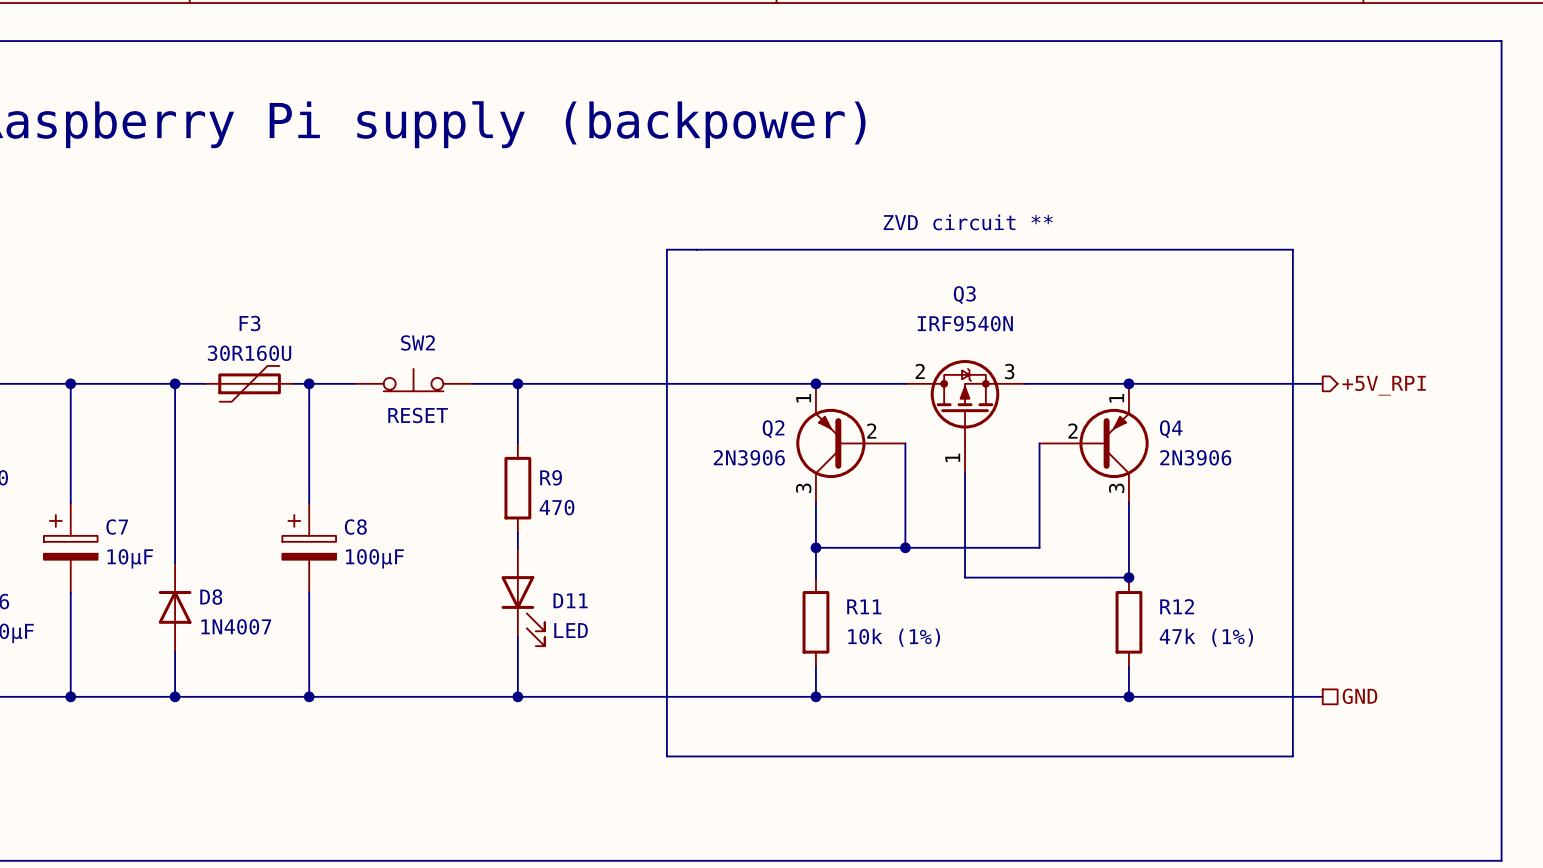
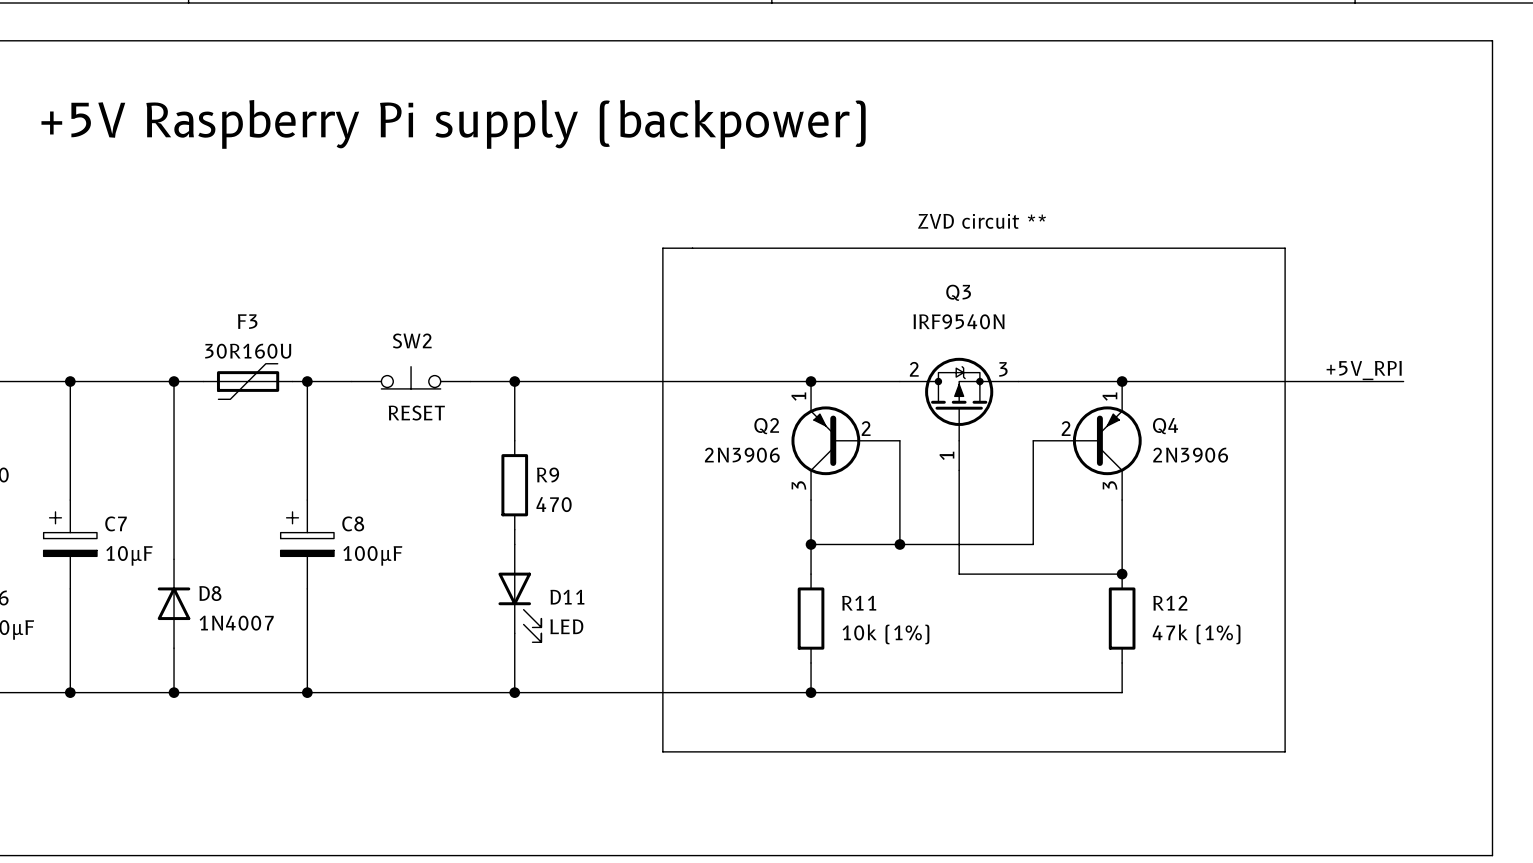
label: none -> +5V_RPI (1364, 370)
wire: none -> (1314, 381) (1403, 381)
hierarchical label: +5V_RPI (1384, 385) -> none
wire: (1128, 696) (1322, 696) -> none
junction: (1128, 696) -> none
hierarchical label: GND (1359, 696) -> none

